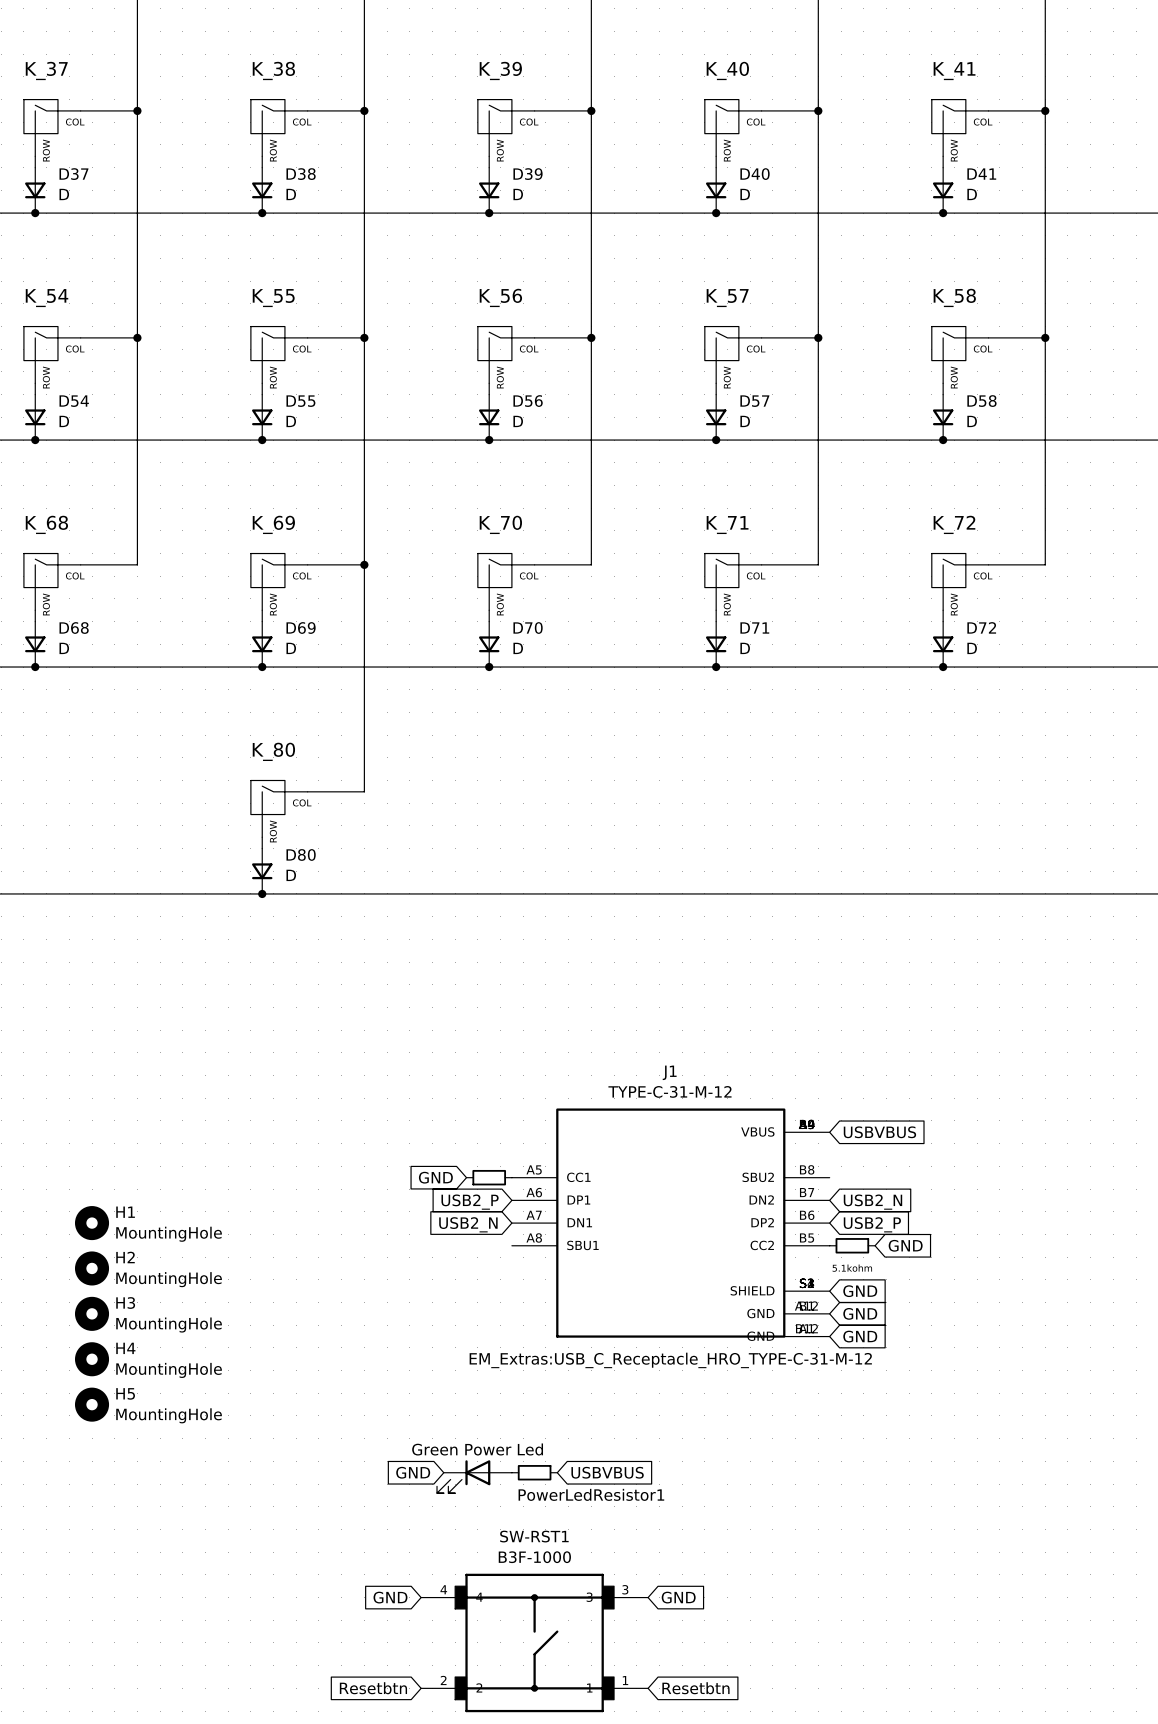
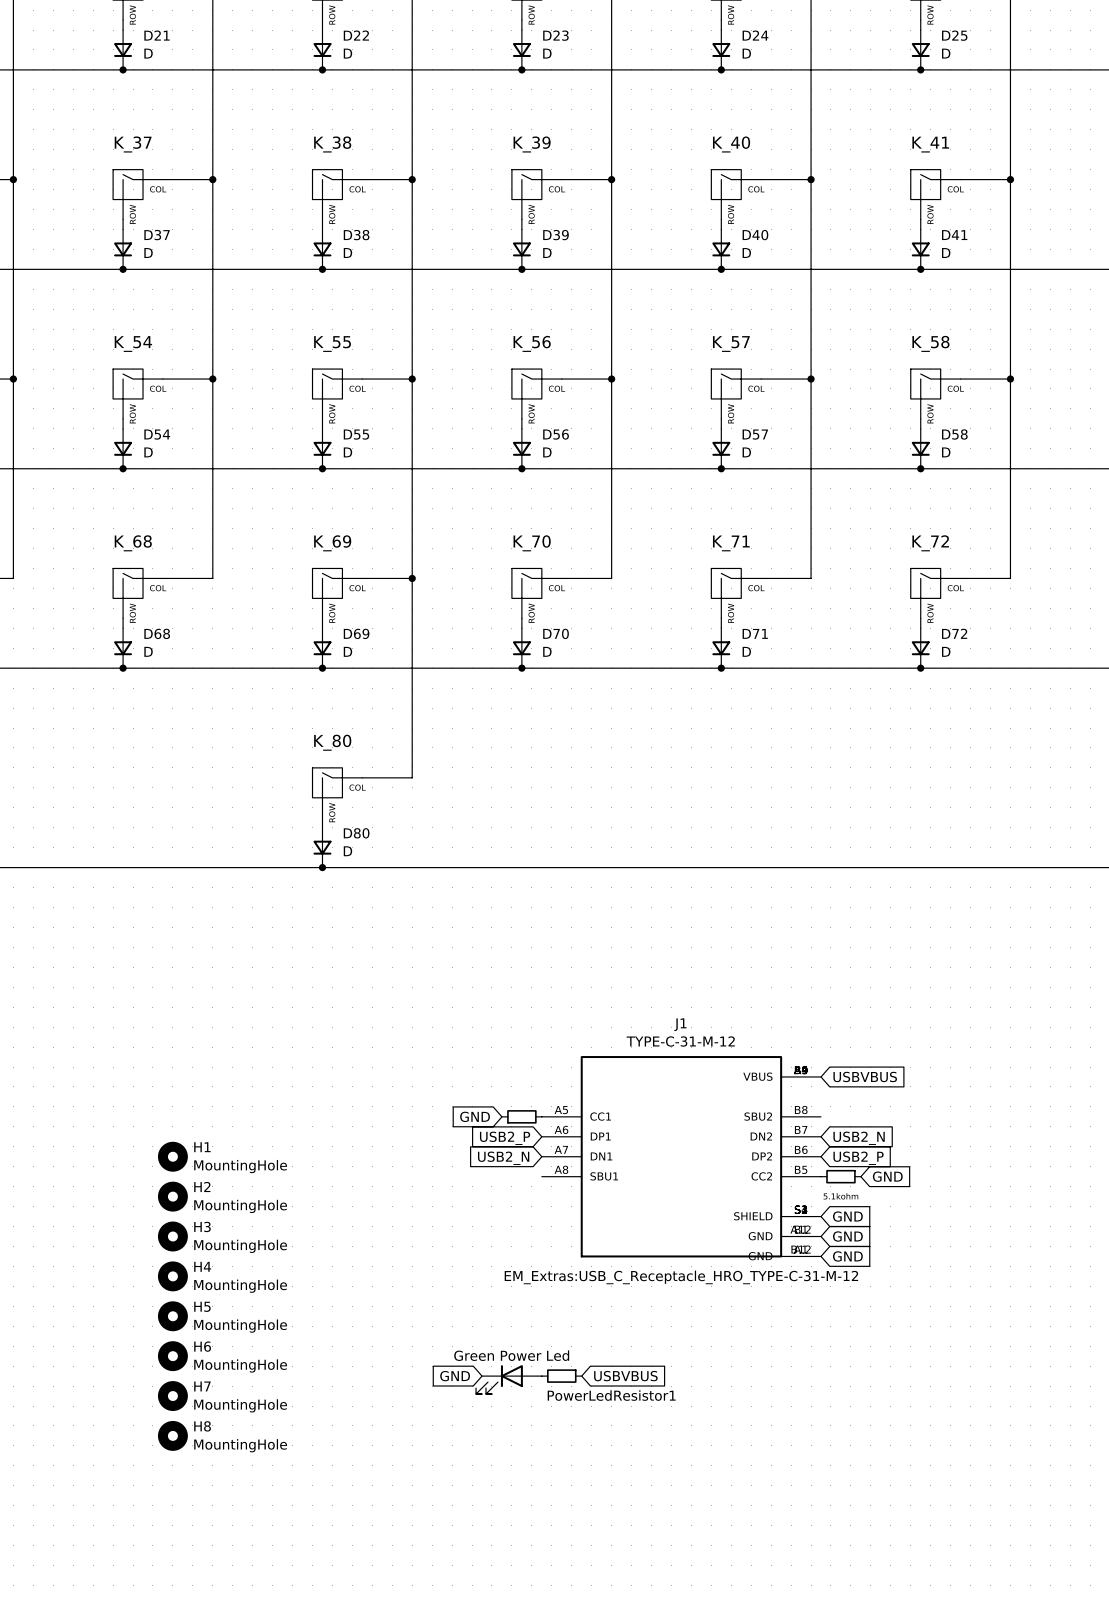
H6: none -> MountingHole (172, 1356)
H7: none -> MountingHole (172, 1396)
H8: none -> MountingHole (172, 1435)
global label: GND (390, 1597) -> none
global label: GND (678, 1597) -> none
SW-RST1: B3F-1000 (534, 1642) -> none
global label: Resetbtn (373, 1688) -> none
global label: Resetbtn (695, 1688) -> none

